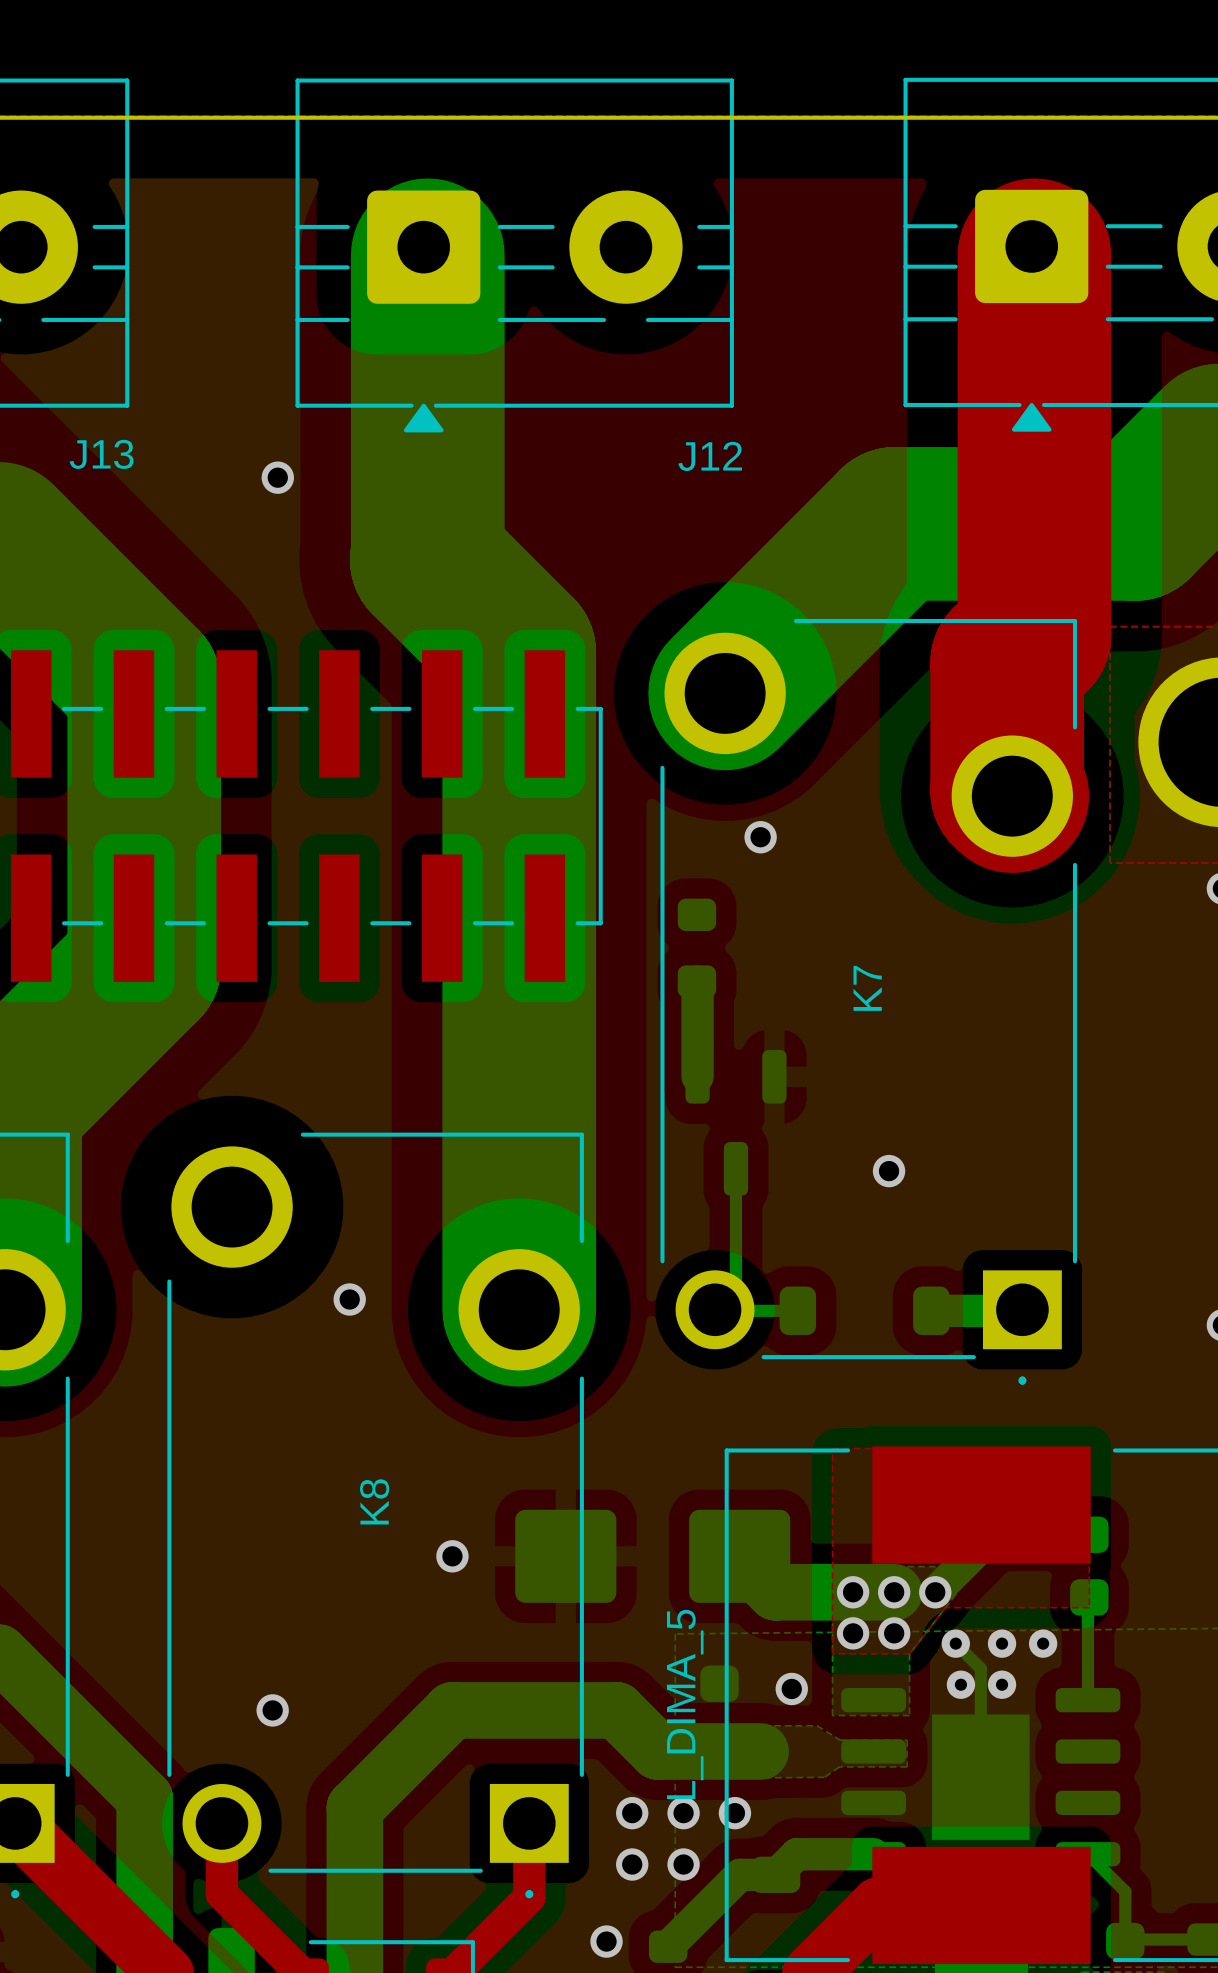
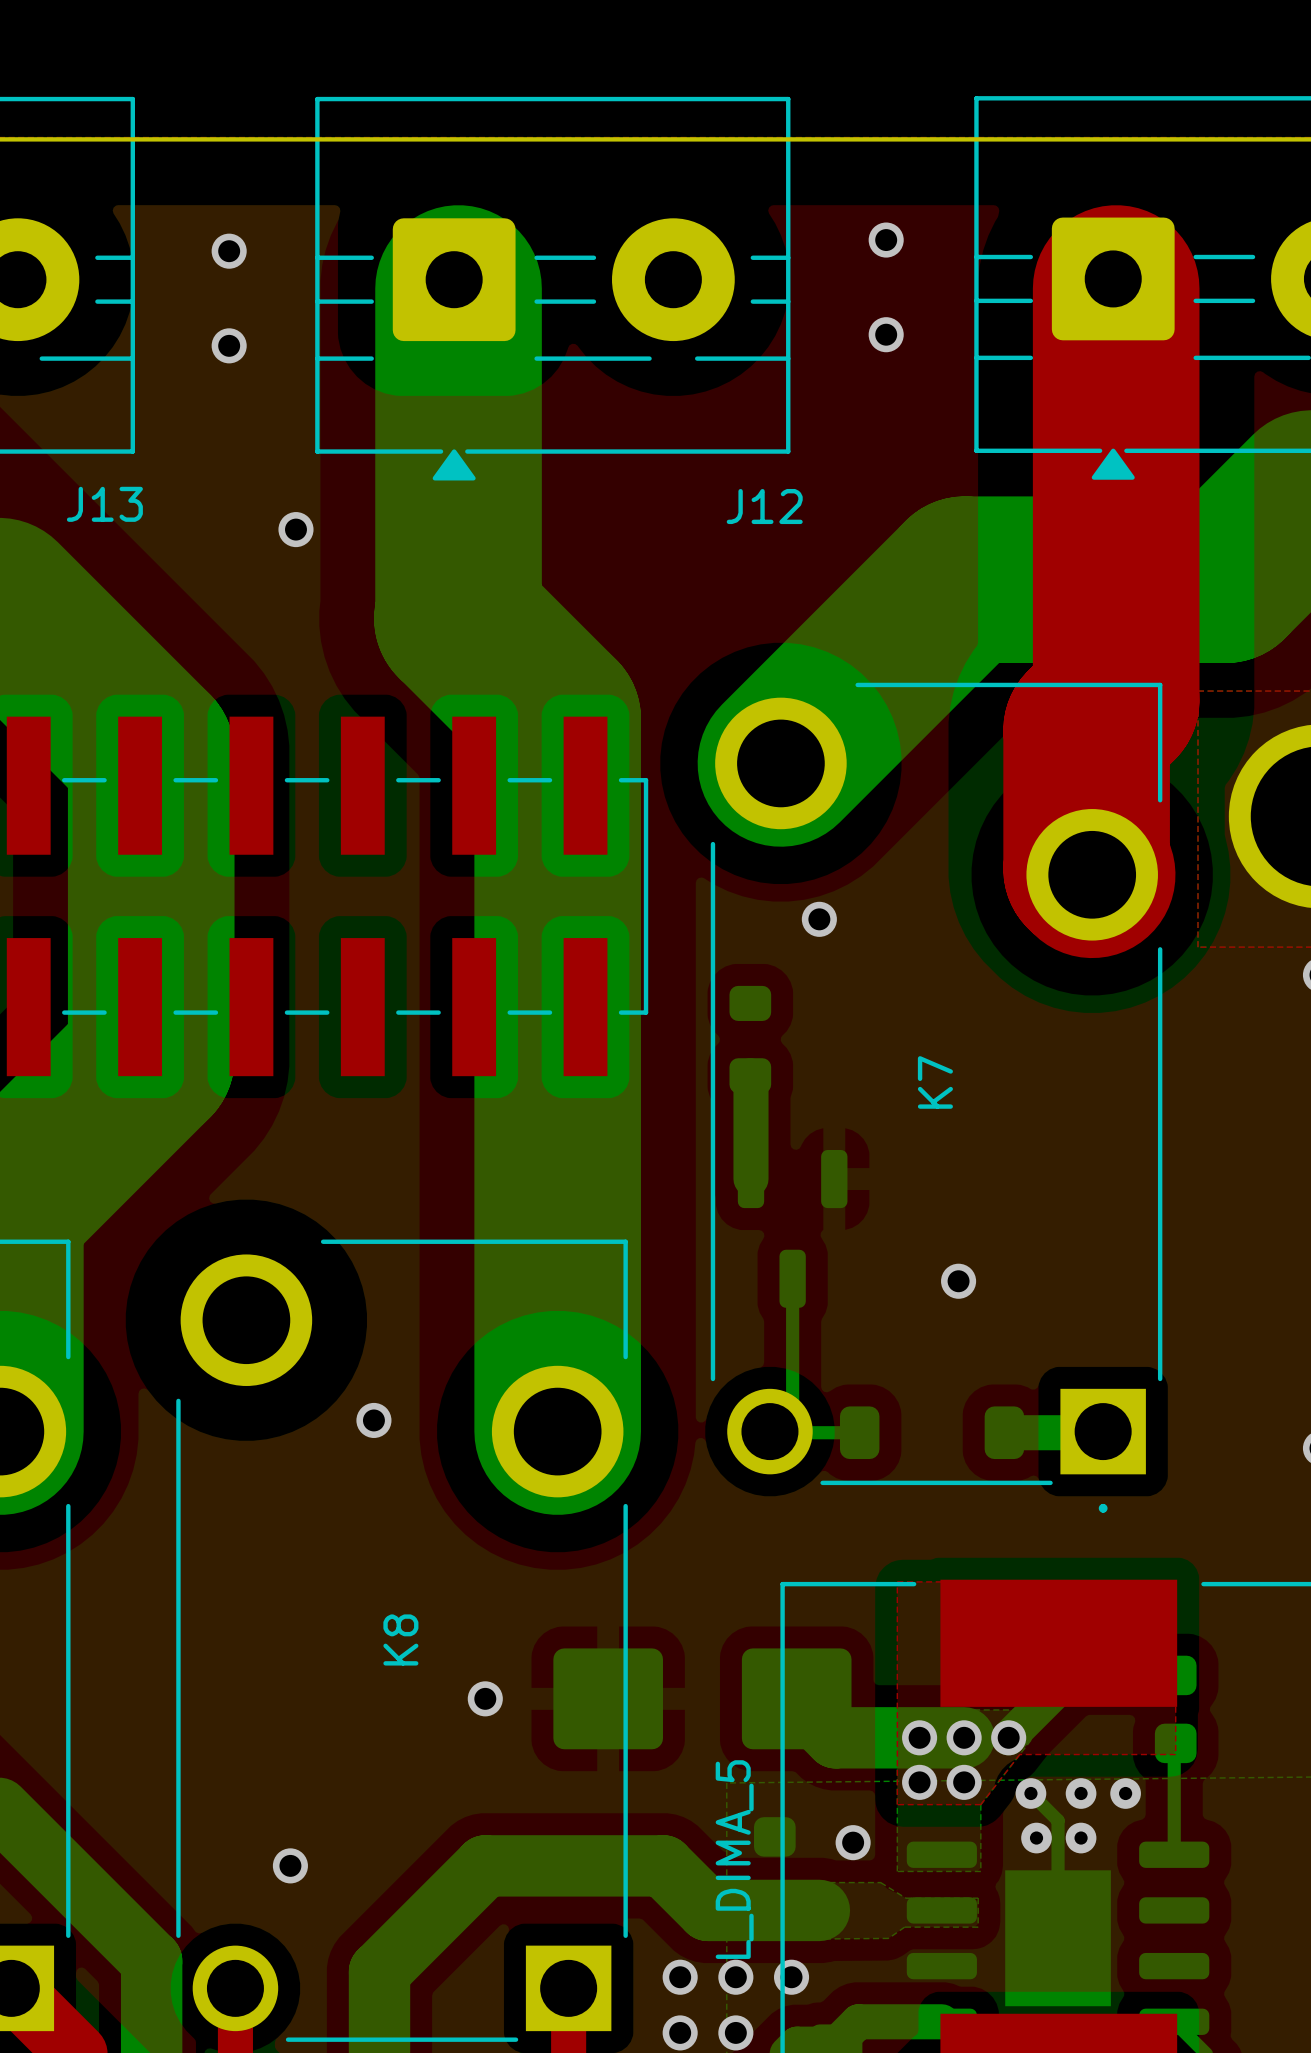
via: none -> (886, 240)
via: none -> (229, 251)
via: none -> (886, 334)
via: none -> (229, 345)

